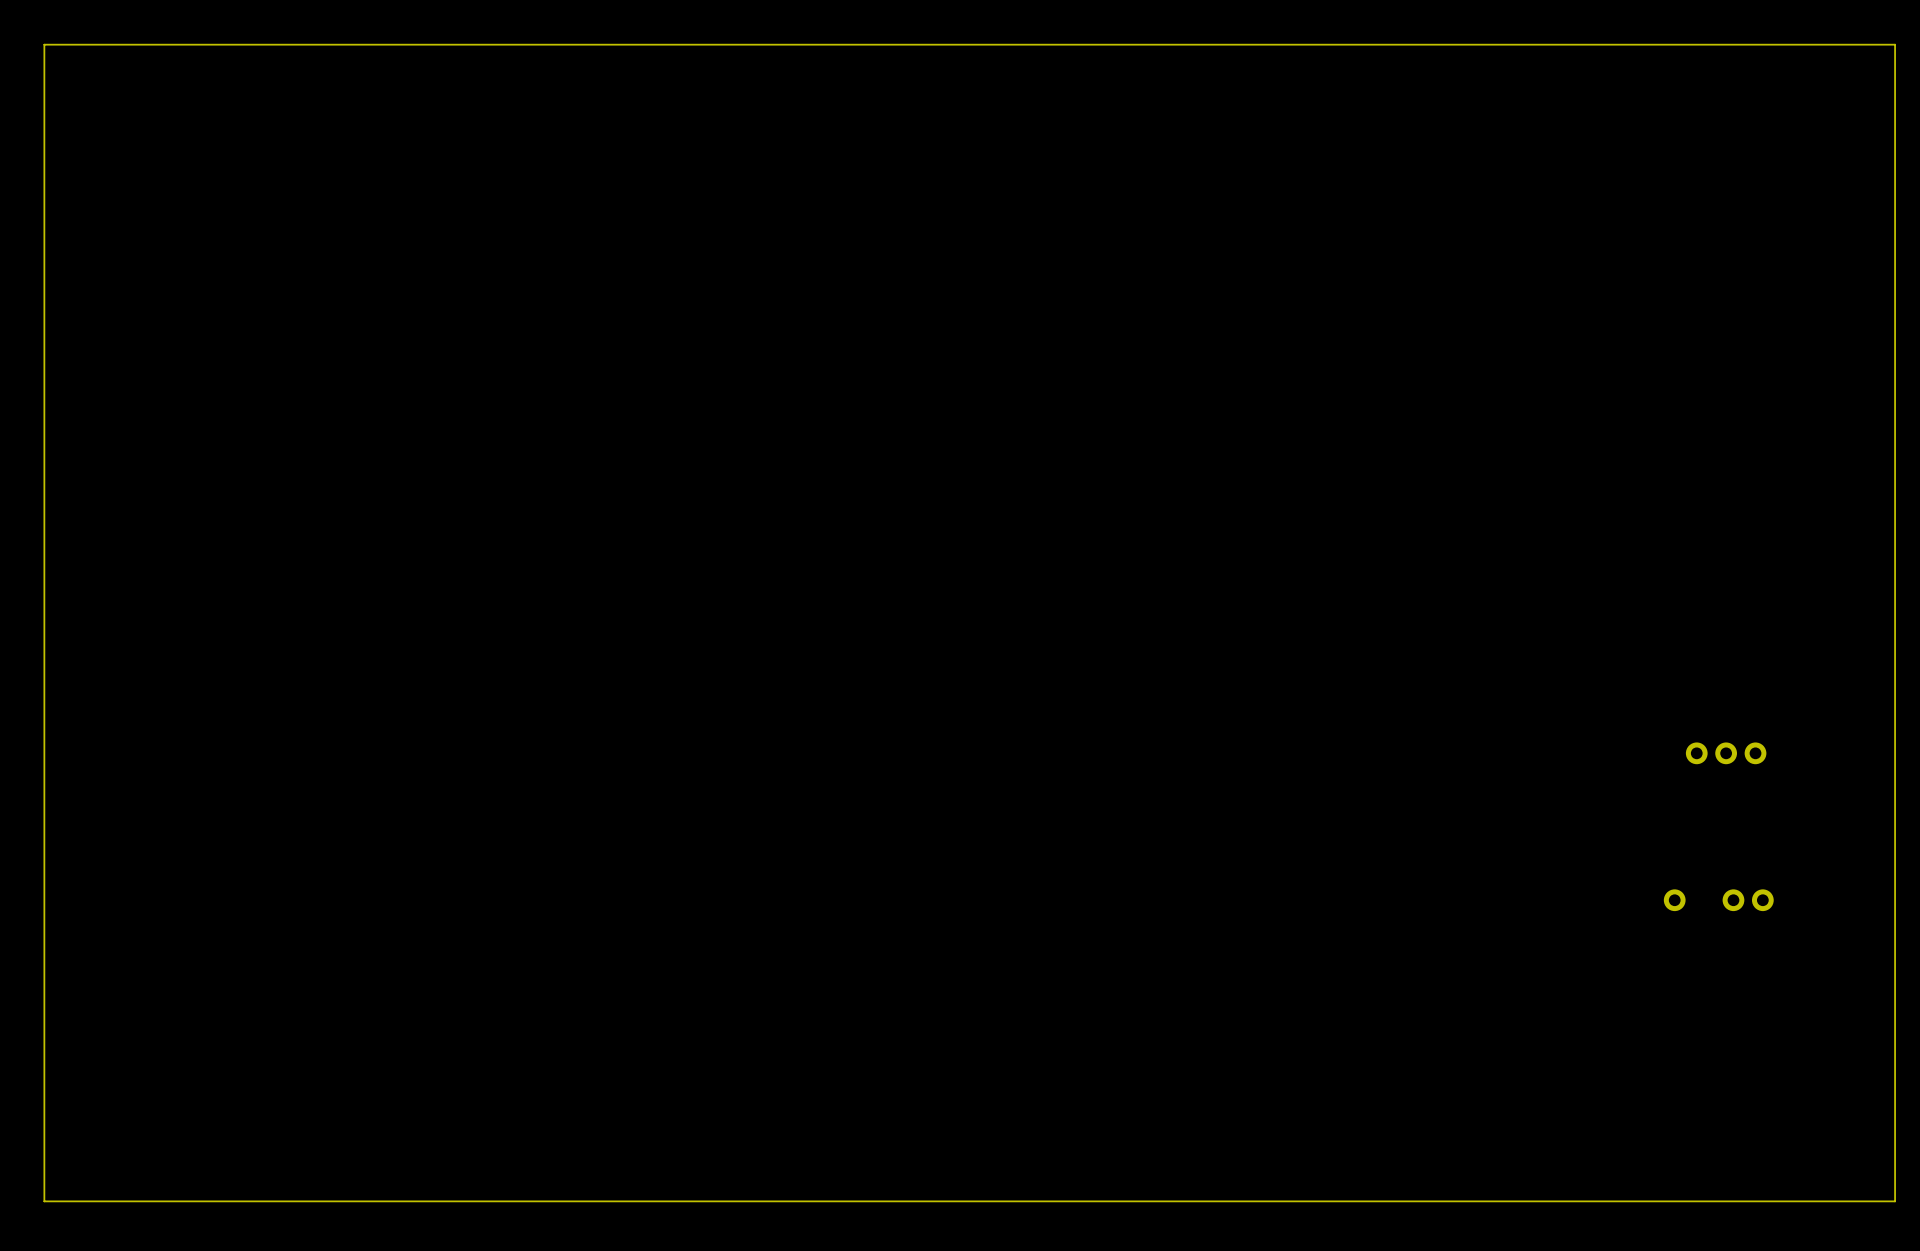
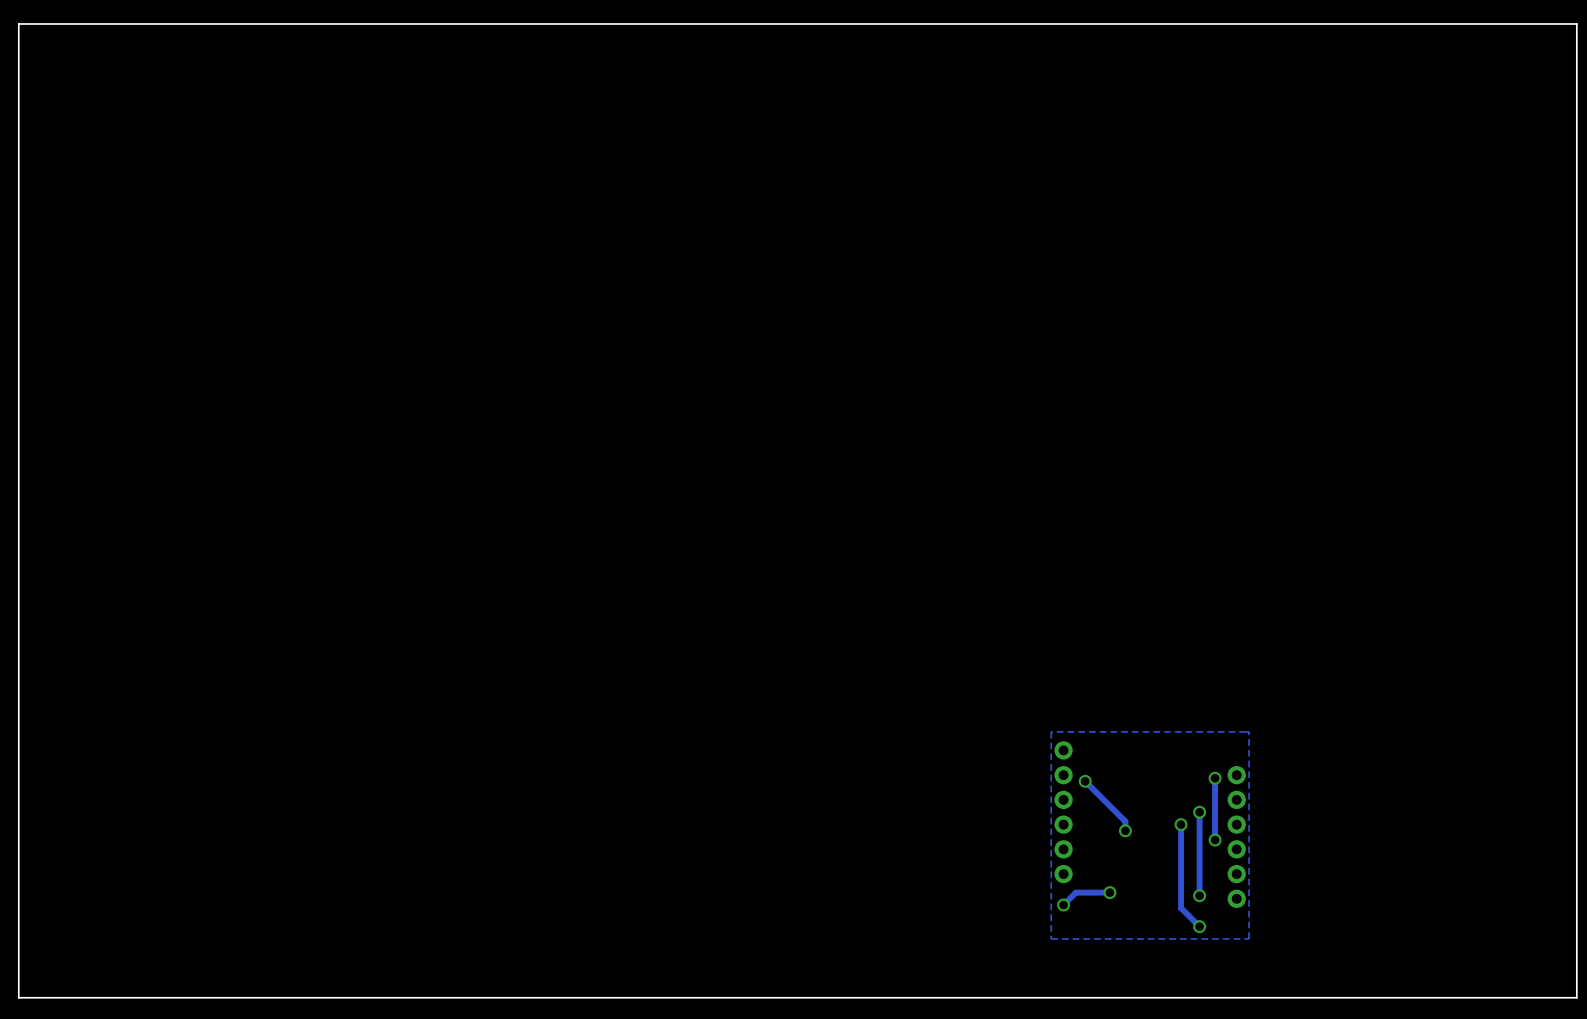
part: (1711, 753) -> none
part: (1755, 753) -> none
zone outline: none -> (1249, 731) (1051, 731) (1051, 939) (1249, 939) (1249, 731)
part: (1674, 900) -> none
part: (1748, 900) -> none
part: none -> (1063, 750)
track: none -> (1215, 778) (1215, 840)
via: none -> (1215, 778)
track: none -> (1085, 781) (1125, 821) (1125, 830)
via: none -> (1085, 781)
track: none -> (1199, 812) (1199, 895)
via: none -> (1199, 812)
part: none -> (1063, 824)
track: none -> (1181, 824) (1181, 908) (1199, 926)
via: none -> (1181, 824)
part: none -> (1236, 824)
via: none -> (1125, 830)
via: none -> (1215, 840)
track: none -> (1109, 892) (1075, 892) (1063, 905)
via: none -> (1109, 892)
via: none -> (1199, 895)
part: none -> (1236, 898)
via: none -> (1063, 905)
via: none -> (1199, 926)

